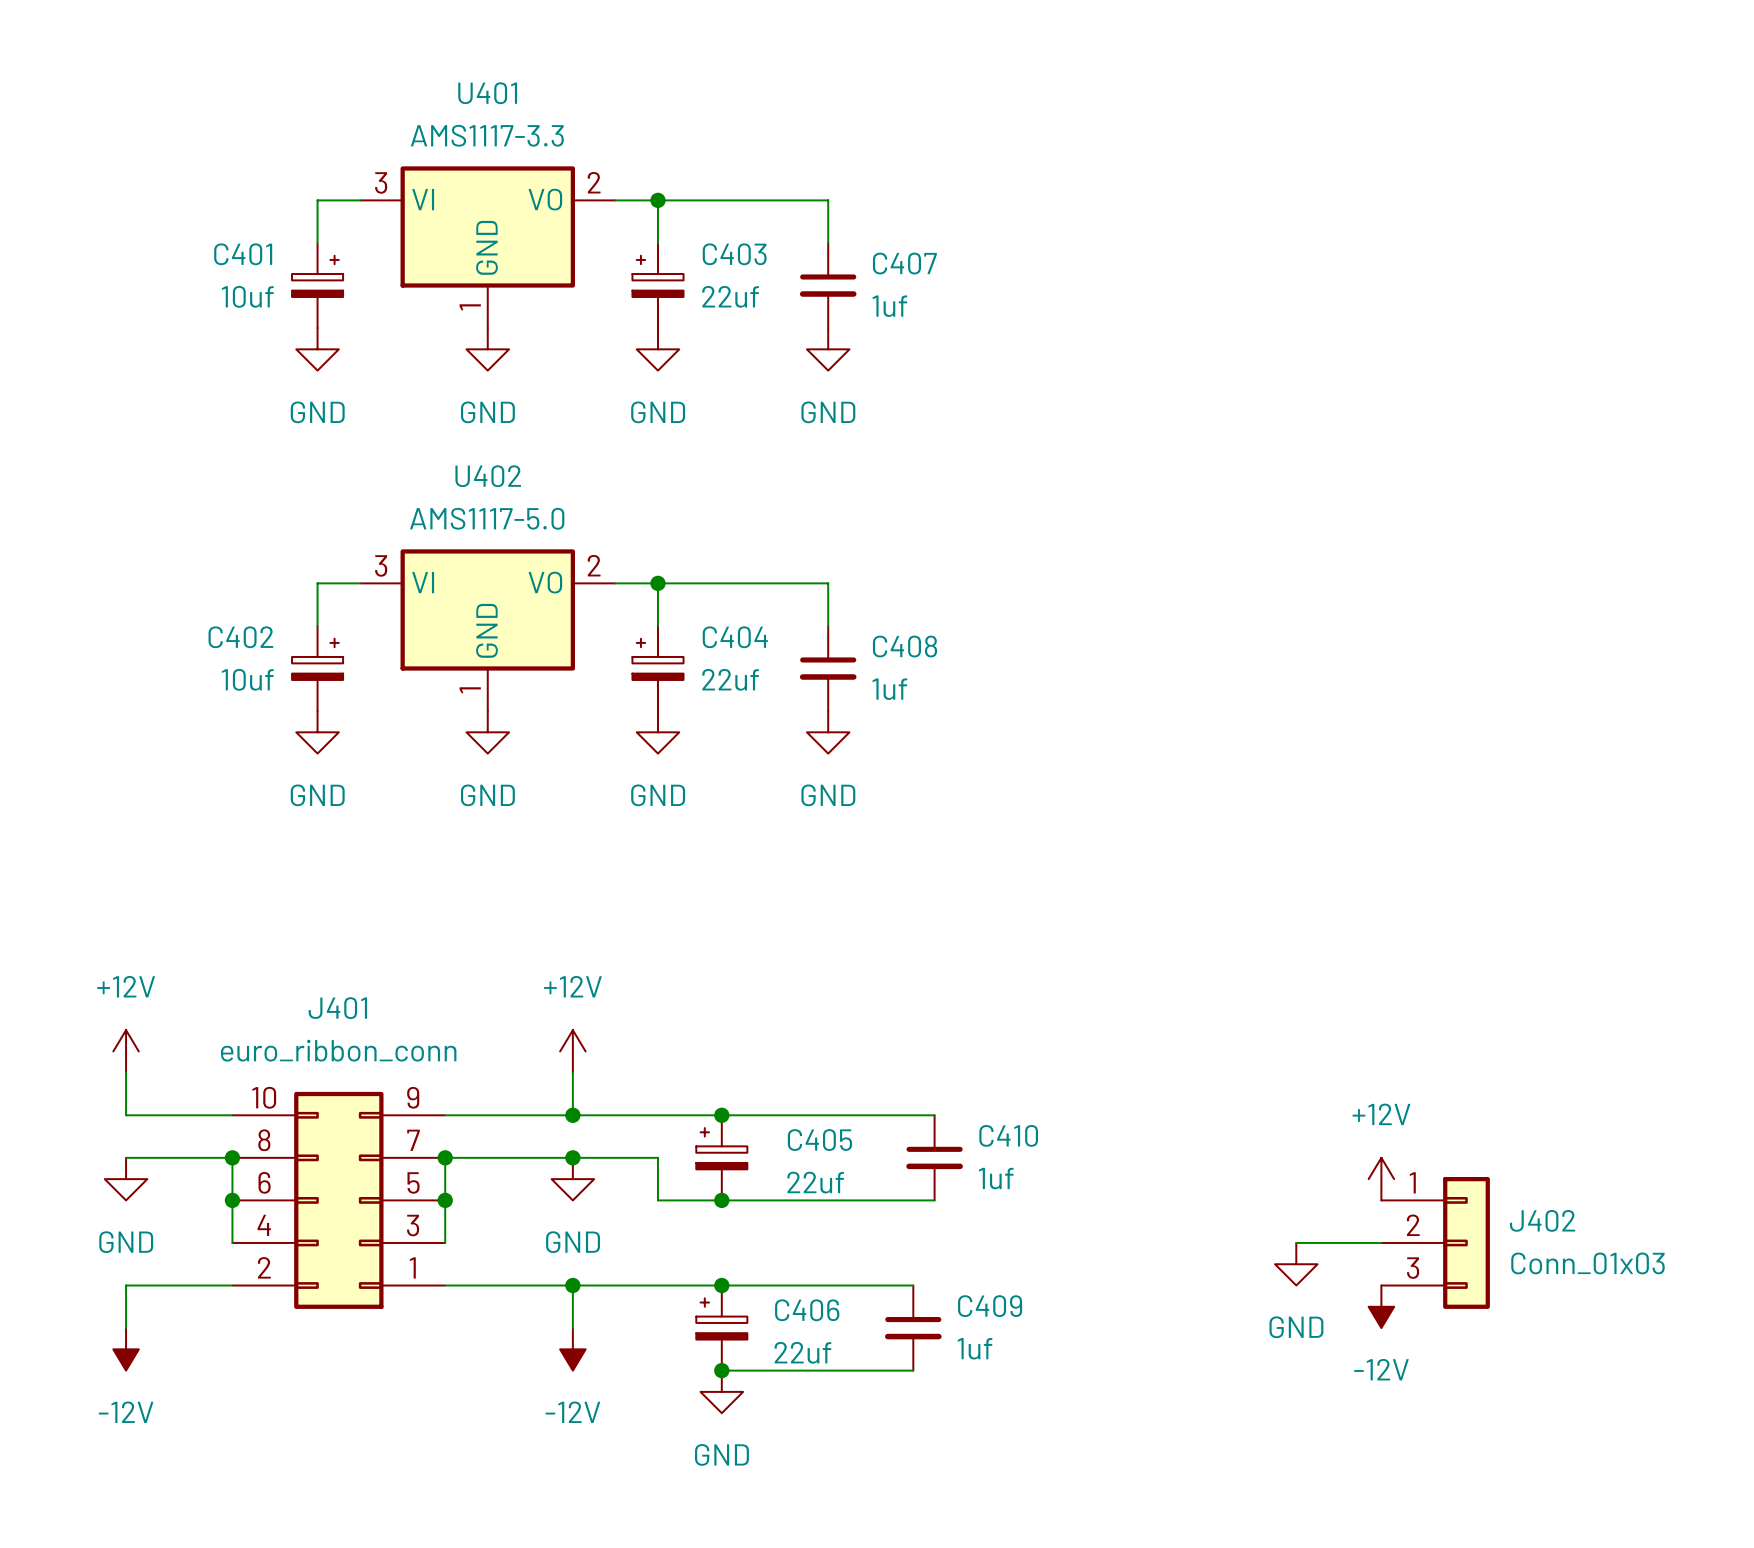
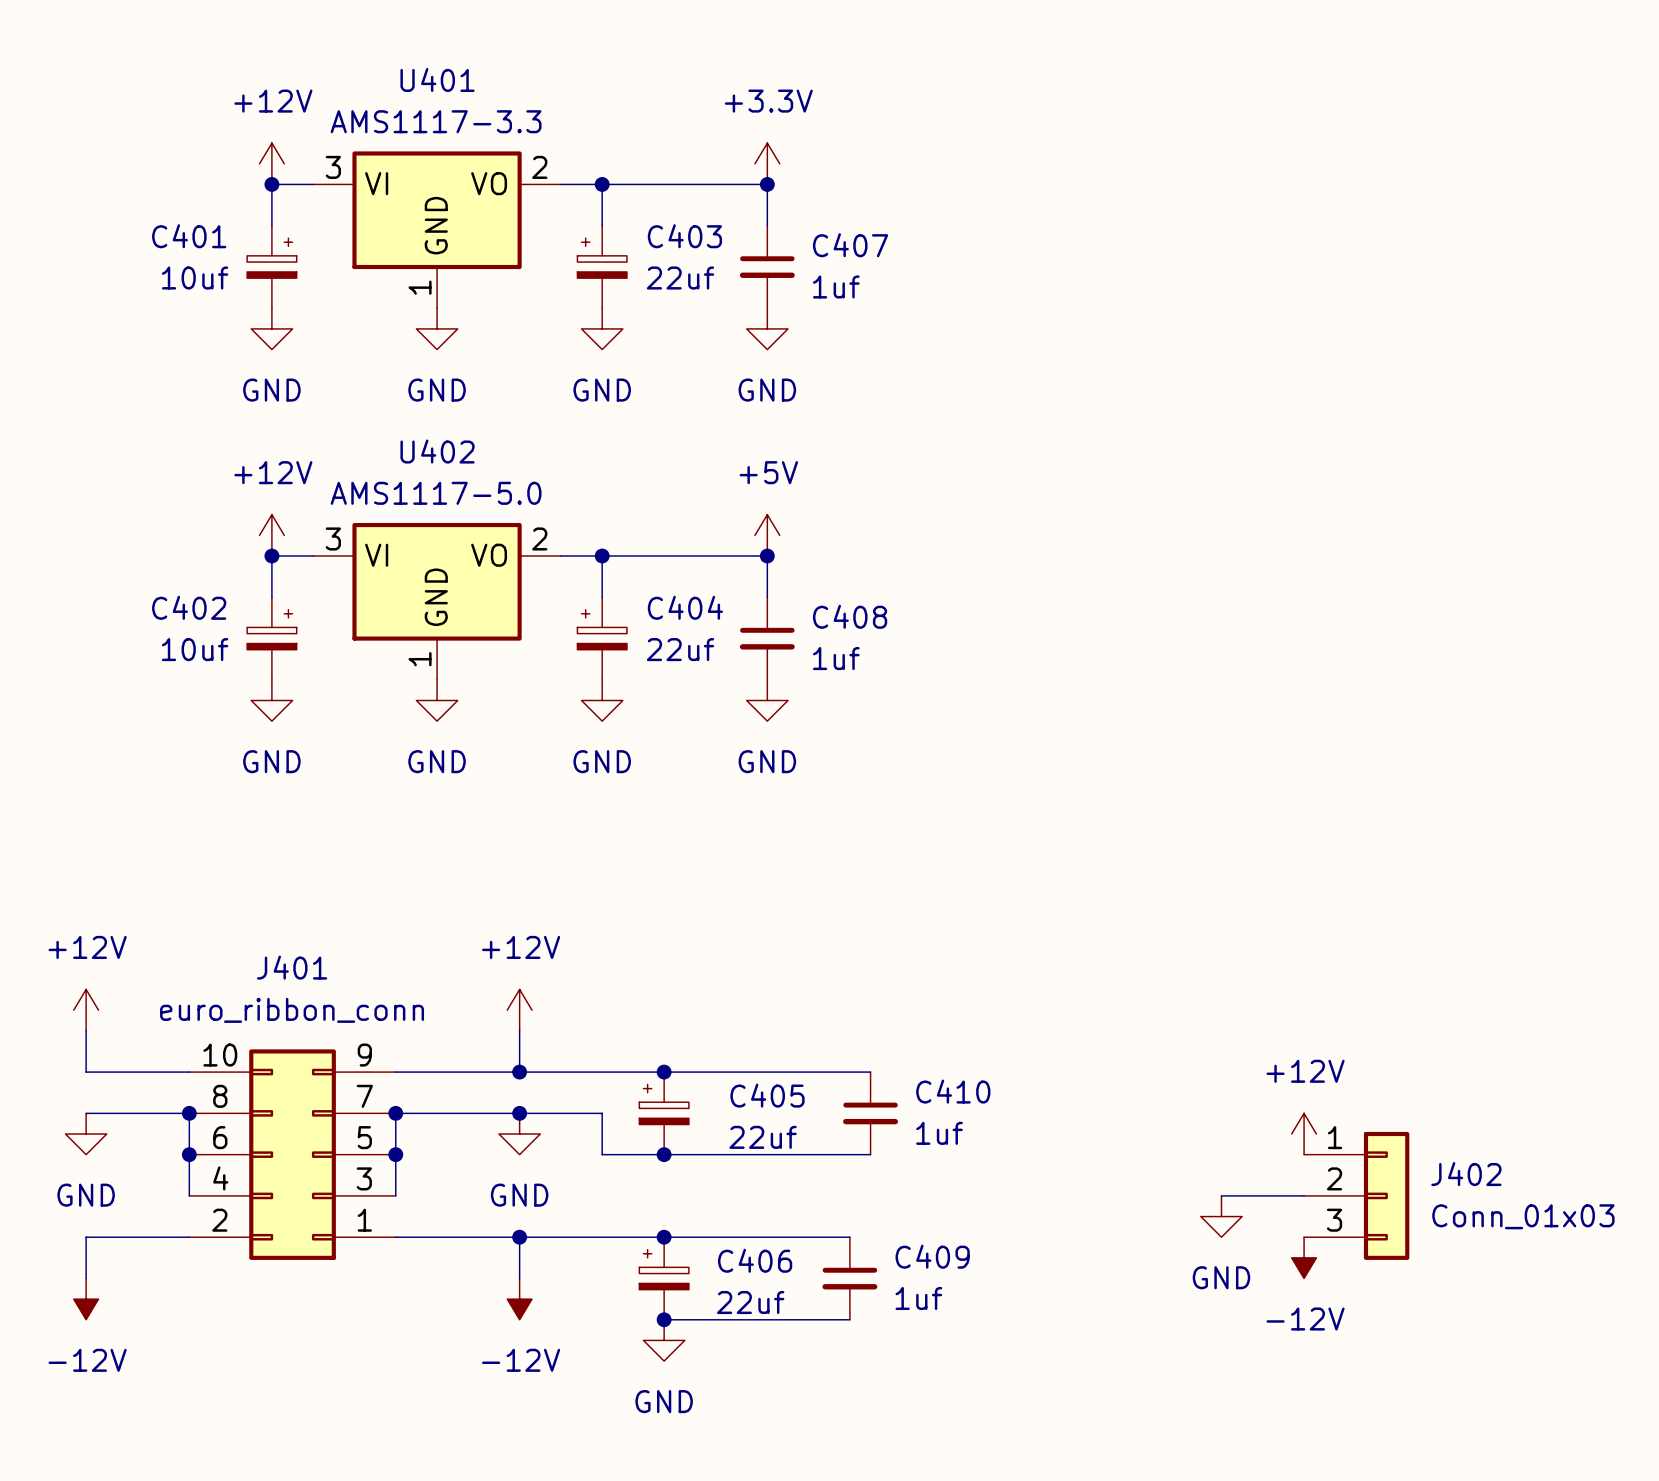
power symbol: none -> +12V (271, 163)
power symbol: none -> +3.3V (767, 163)
junction: none -> (271, 184)
junction: none -> (767, 184)
power symbol: none -> +12V (271, 535)
power symbol: none -> +5V (767, 535)
junction: none -> (271, 556)
junction: none -> (767, 556)

